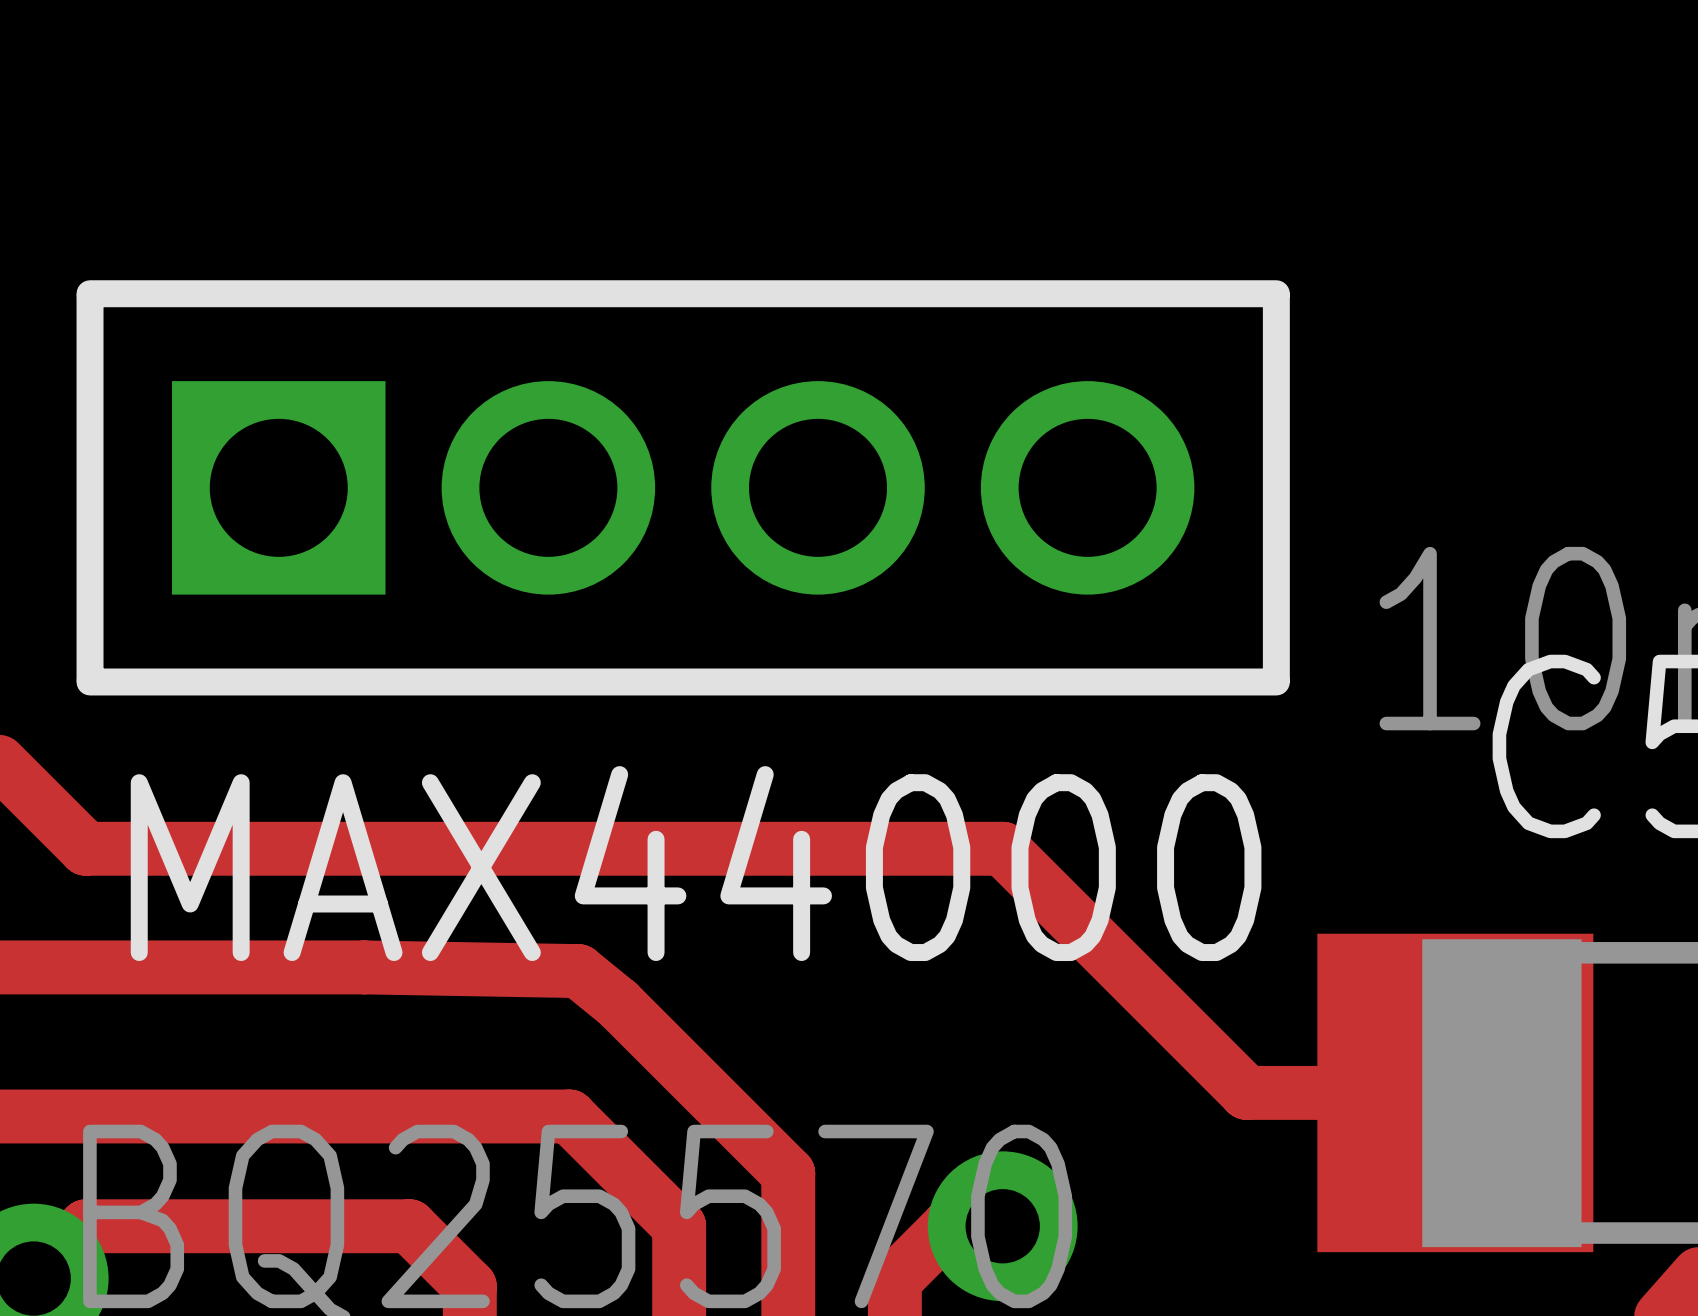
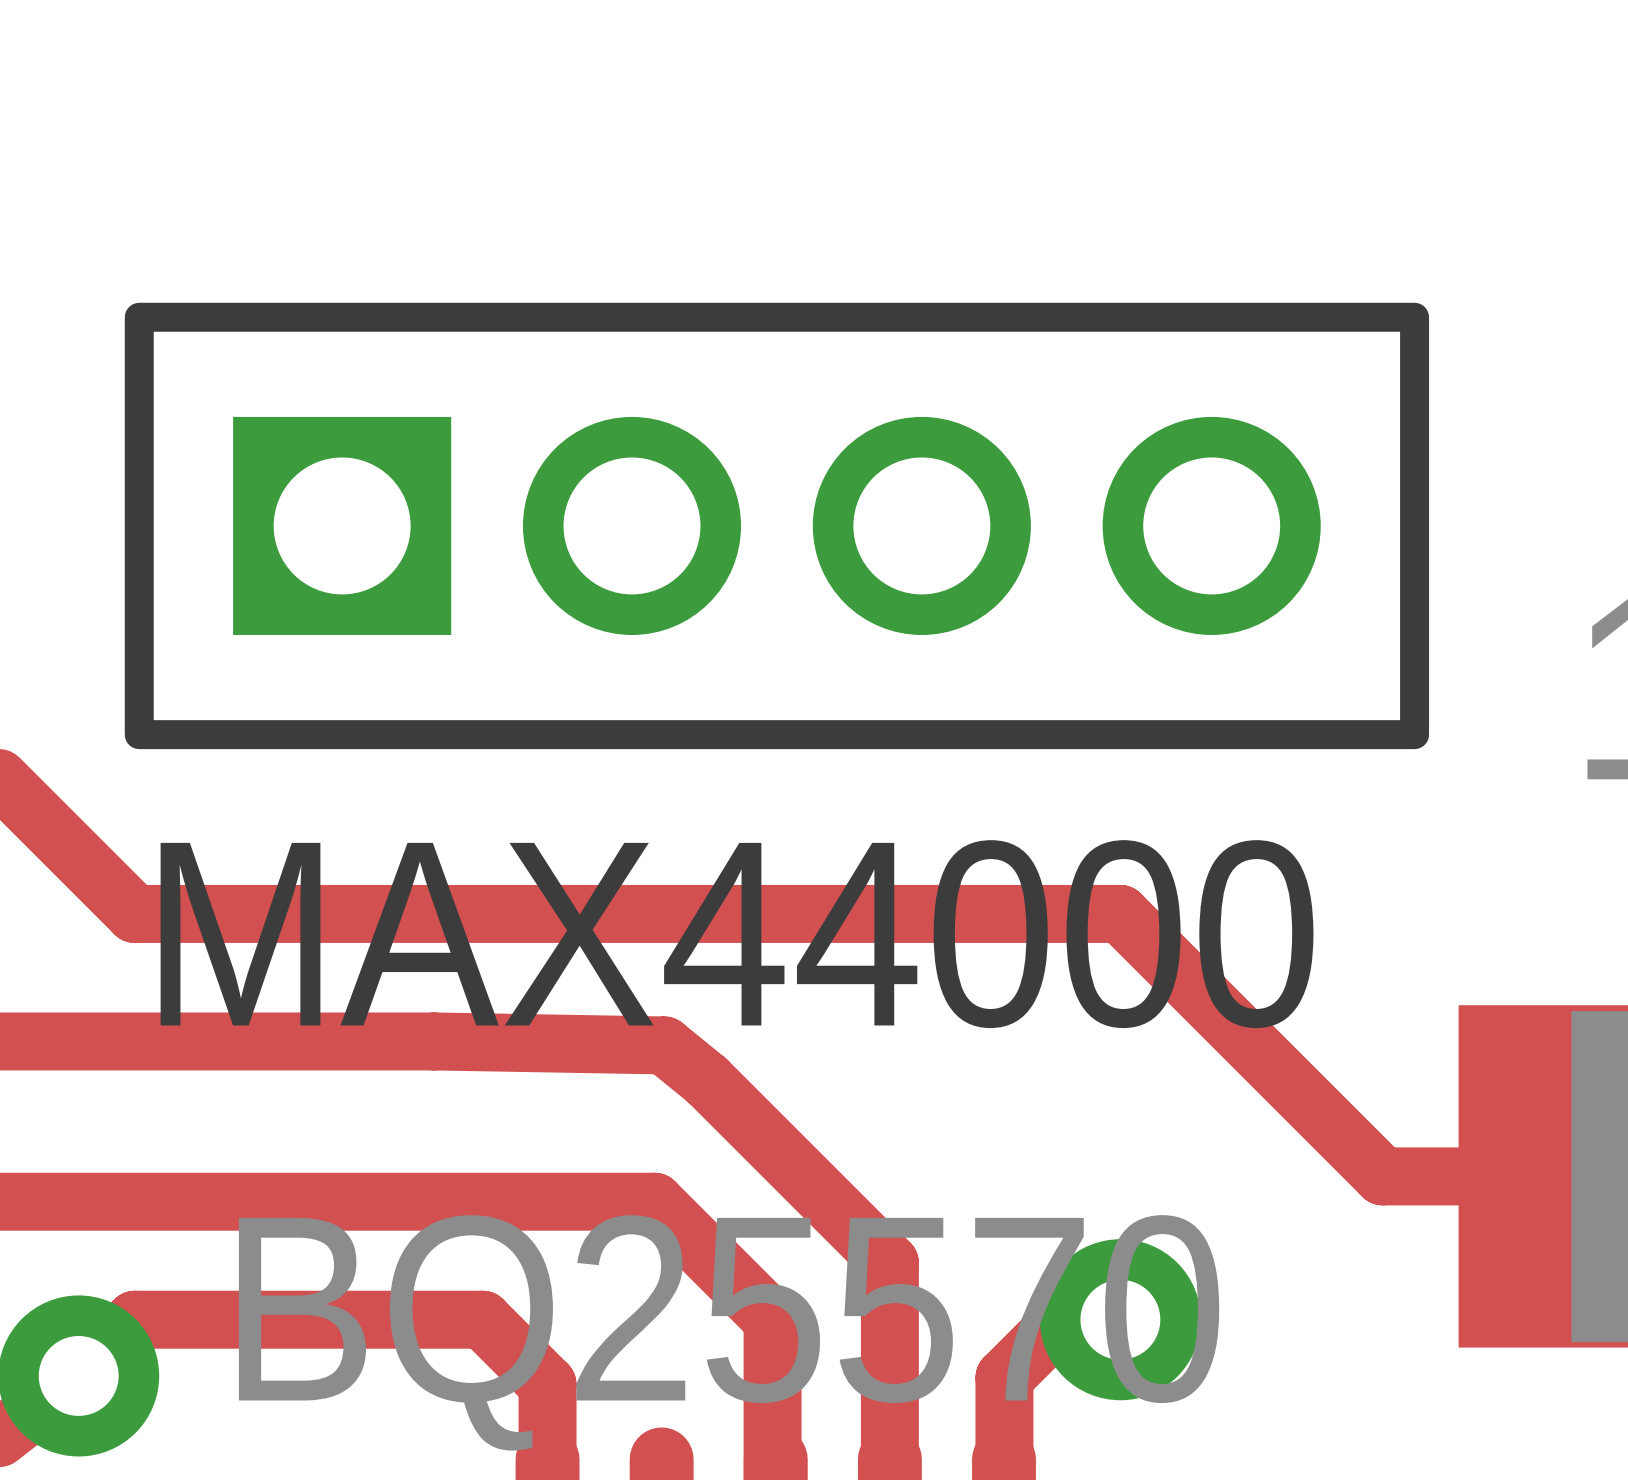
MAX44000 footprint: [76, 280, 1290, 696] -> [124, 302, 1430, 750]

